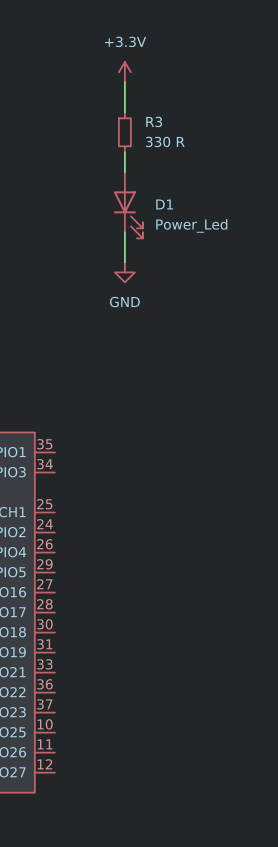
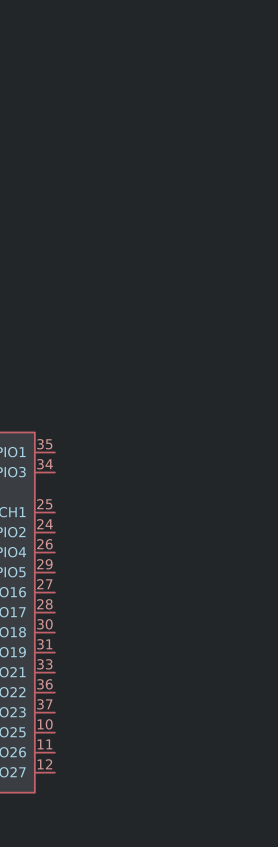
power symbol: +3.3V (124, 72) -> none
wire: (124, 82) (124, 112) -> none
R3: 330 R (124, 132) -> none
wire: (124, 152) (124, 172) -> none
D1: Power_Led (128, 205) -> none
wire: (124, 232) (124, 262) -> none
power symbol: GND (124, 272) -> none

